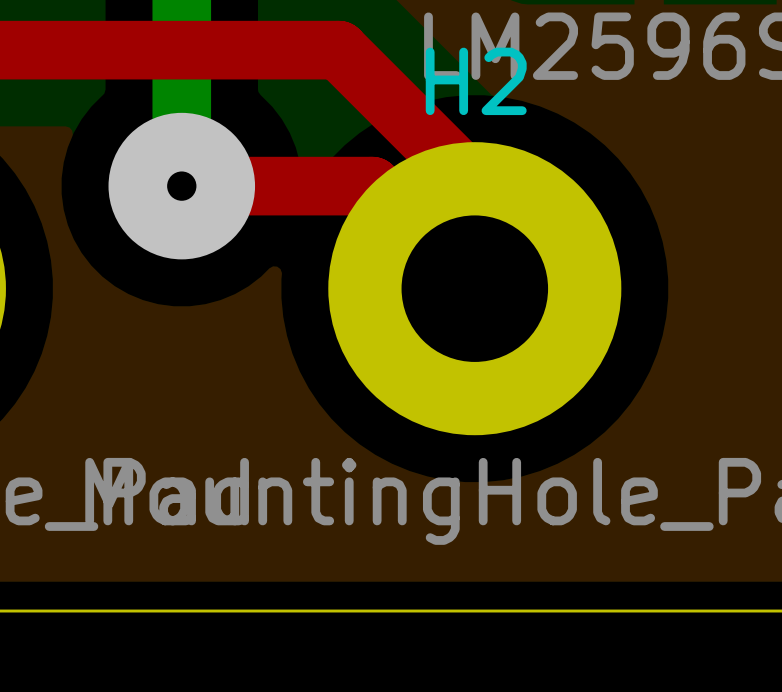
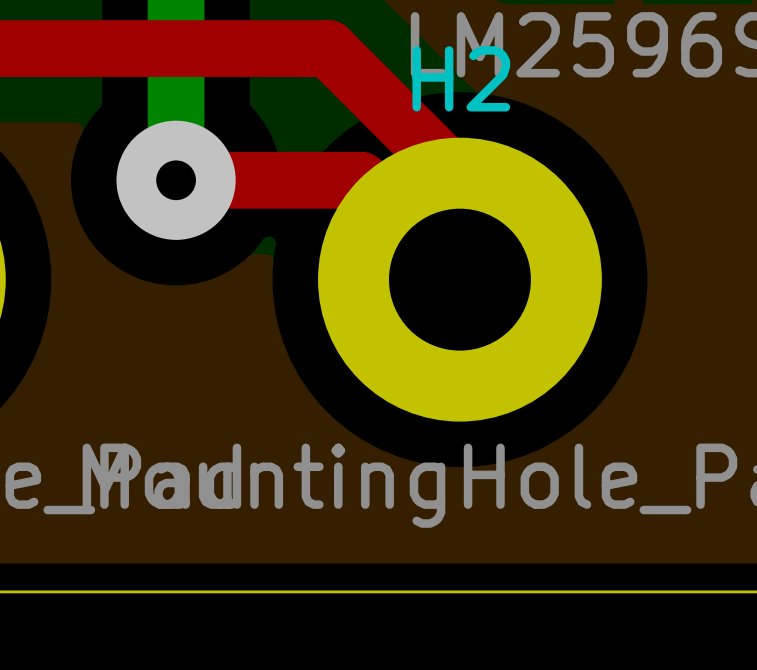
via size: [108, 112, 256, 260] -> [116, 120, 236, 240]

